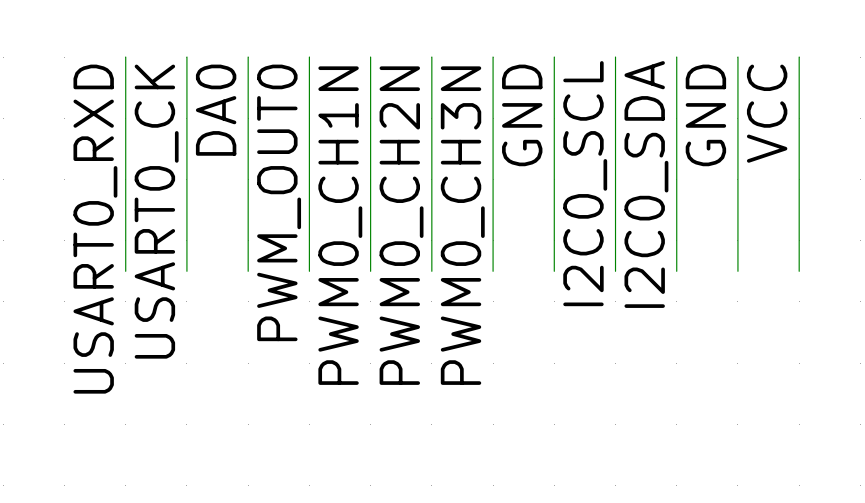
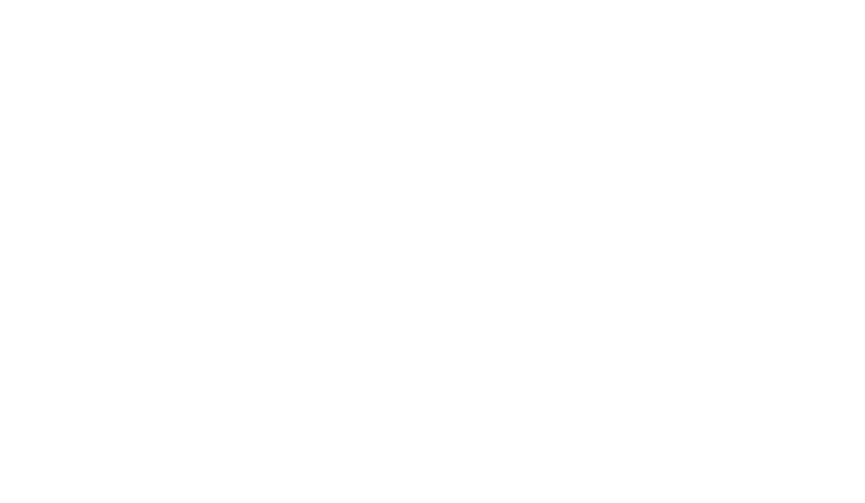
wire: (125, 57) (125, 271) -> none
wire: (186, 57) (186, 271) -> none
wire: (248, 57) (248, 271) -> none
wire: (309, 57) (309, 271) -> none
wire: (370, 57) (370, 271) -> none
wire: (431, 57) (431, 271) -> none
wire: (493, 57) (493, 271) -> none
wire: (554, 57) (554, 271) -> none
wire: (615, 57) (615, 271) -> none
wire: (676, 57) (676, 271) -> none
wire: (737, 57) (737, 271) -> none
wire: (799, 57) (799, 271) -> none
label: DA0 (216, 110) -> none
label: VCC (767, 113) -> none
label: GND (522, 115) -> none
label: GND (705, 115) -> none
label: I2C0_SCL (585, 183) -> none
label: I2C0_SDA (646, 184) -> none
label: PWM_OUT0 (279, 202) -> none
label: USART0_CK (156, 211) -> none
label: PWM0_CH1N (340, 225) -> none
label: PWM0_CH2N (401, 225) -> none
label: PWM0_CH3N (462, 225) -> none
label: USART0_RXD (95, 229) -> none

